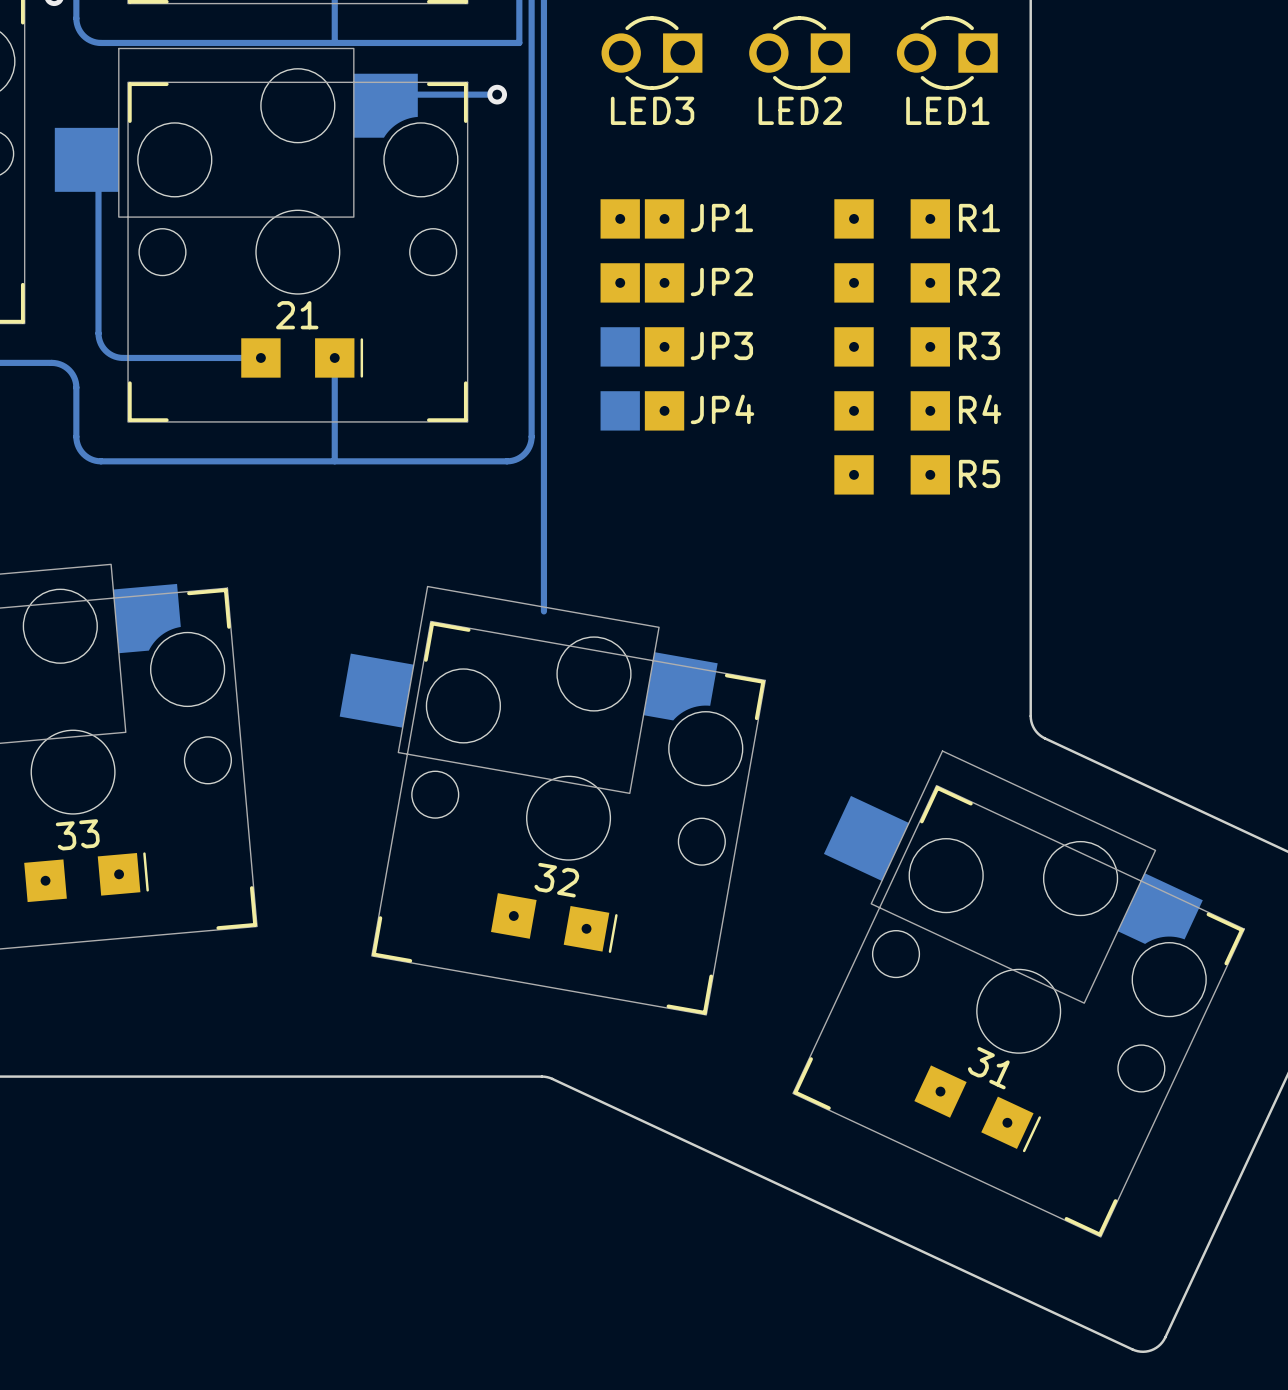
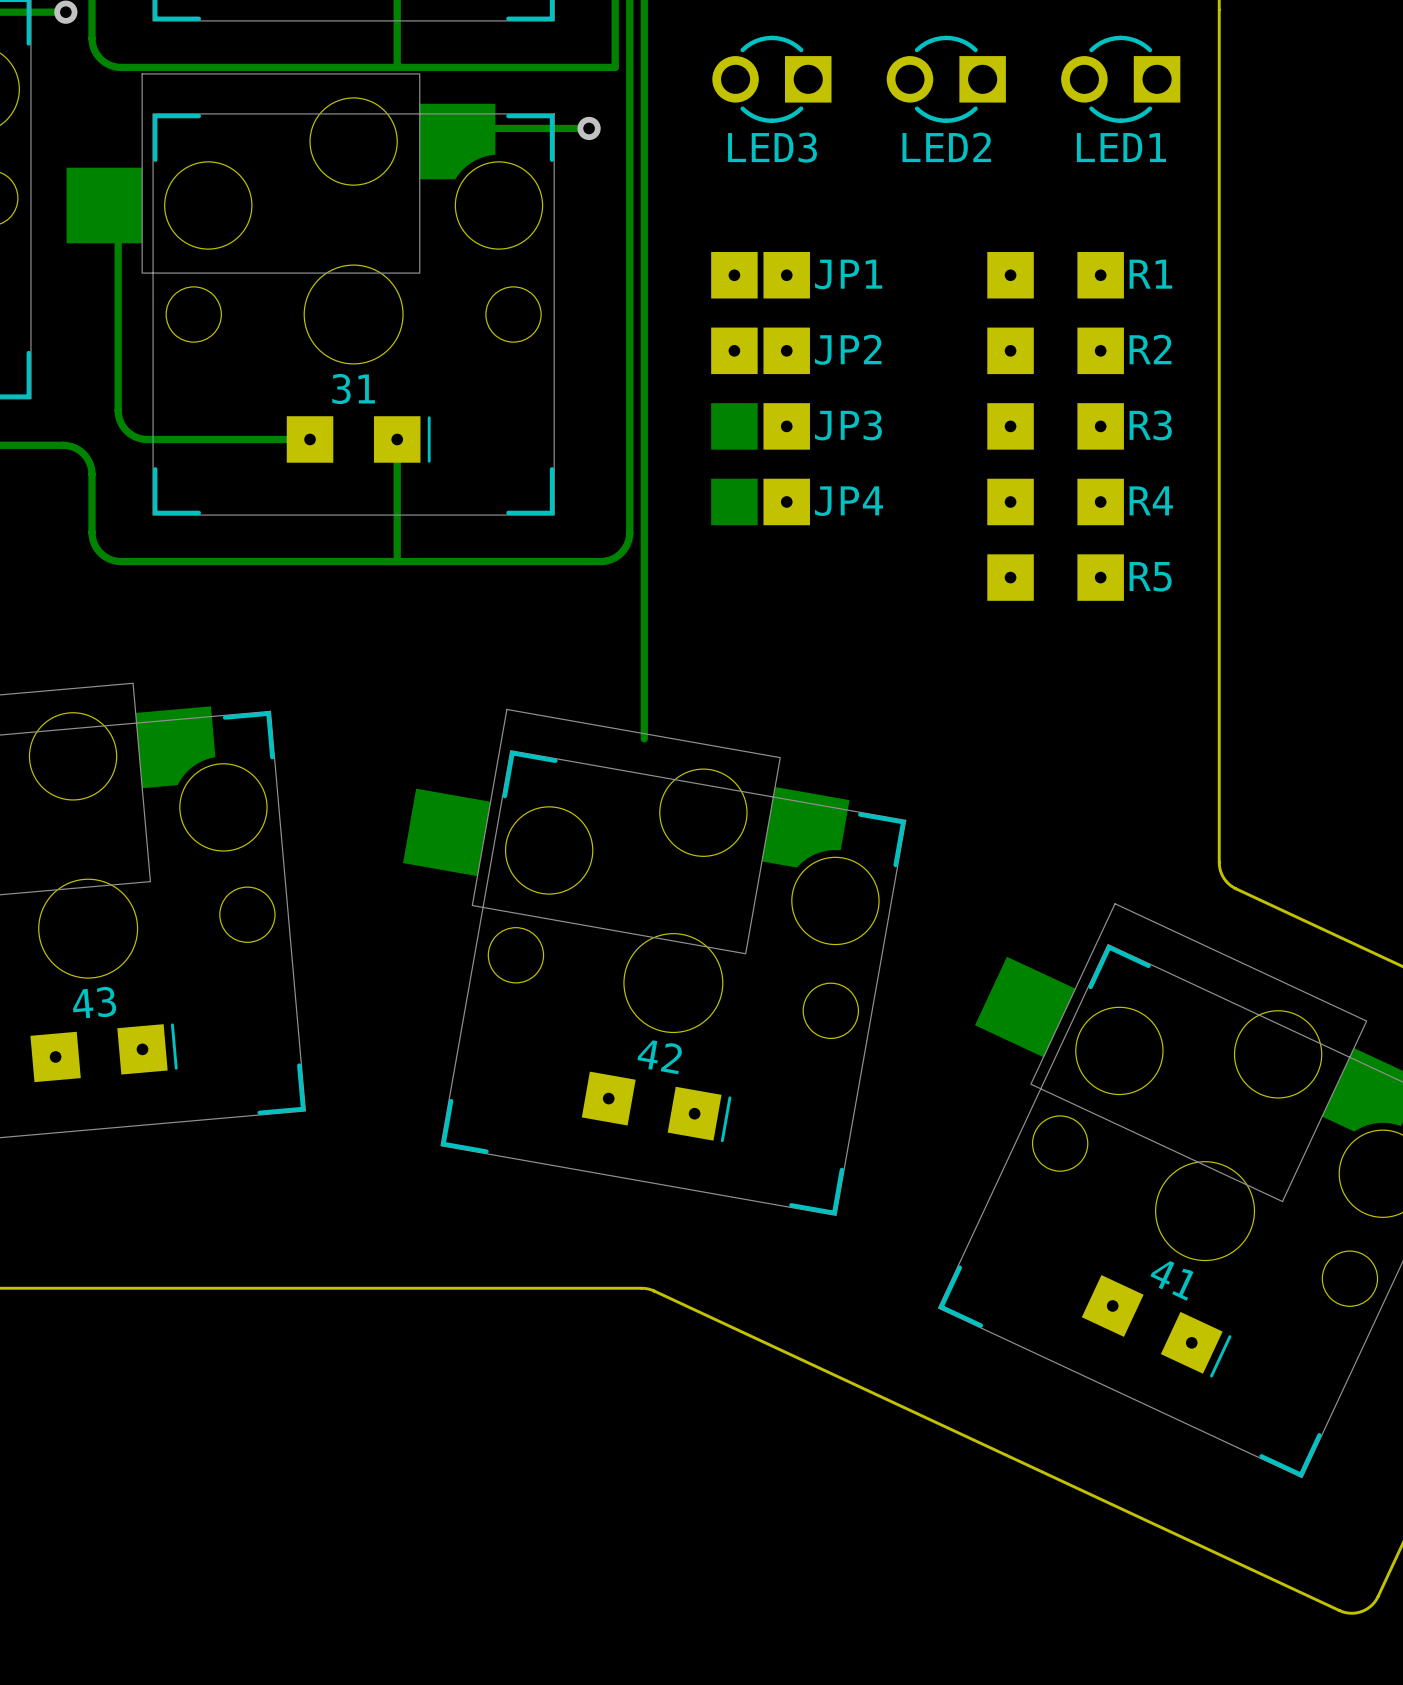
part value: 21 (297, 315) -> 31 (353, 389)
part value: 33 (77, 834) -> 43 (94, 1002)
part value: 32 (556, 880) -> 42 (659, 1057)
part value: 31 (988, 1068) -> 41 (1171, 1280)

